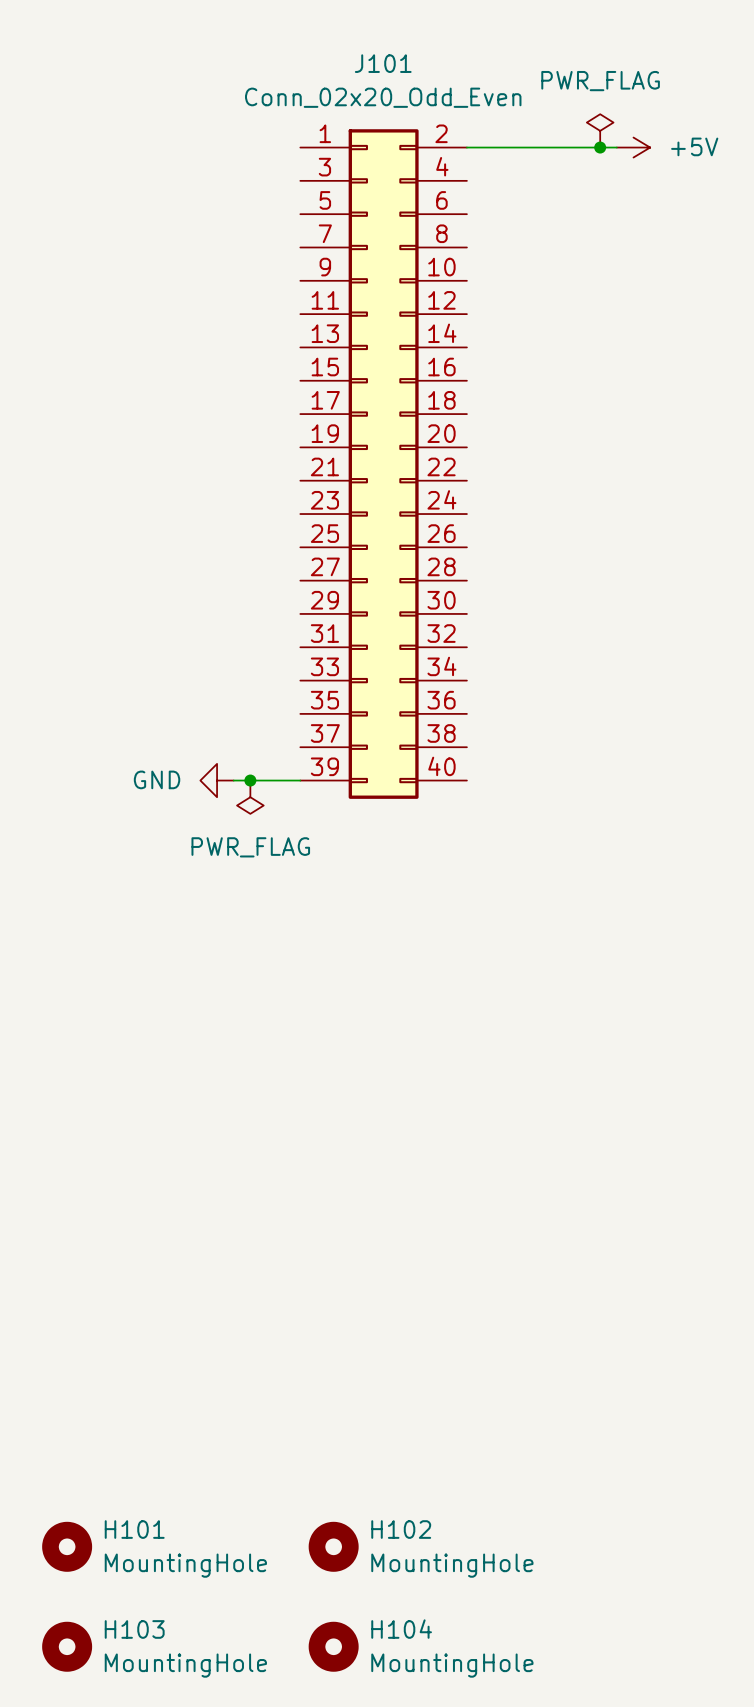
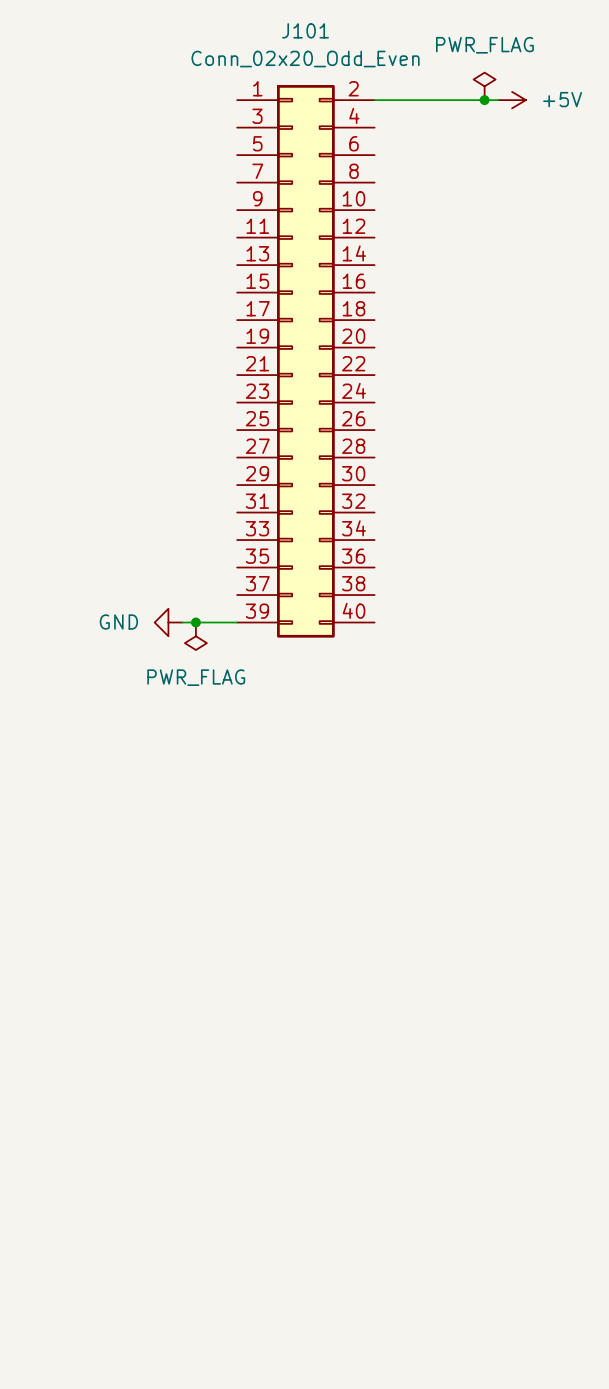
H101: MountingHole (67, 1546) -> none
H102: MountingHole (333, 1546) -> none
H103: MountingHole (67, 1646) -> none
H104: MountingHole (333, 1646) -> none

